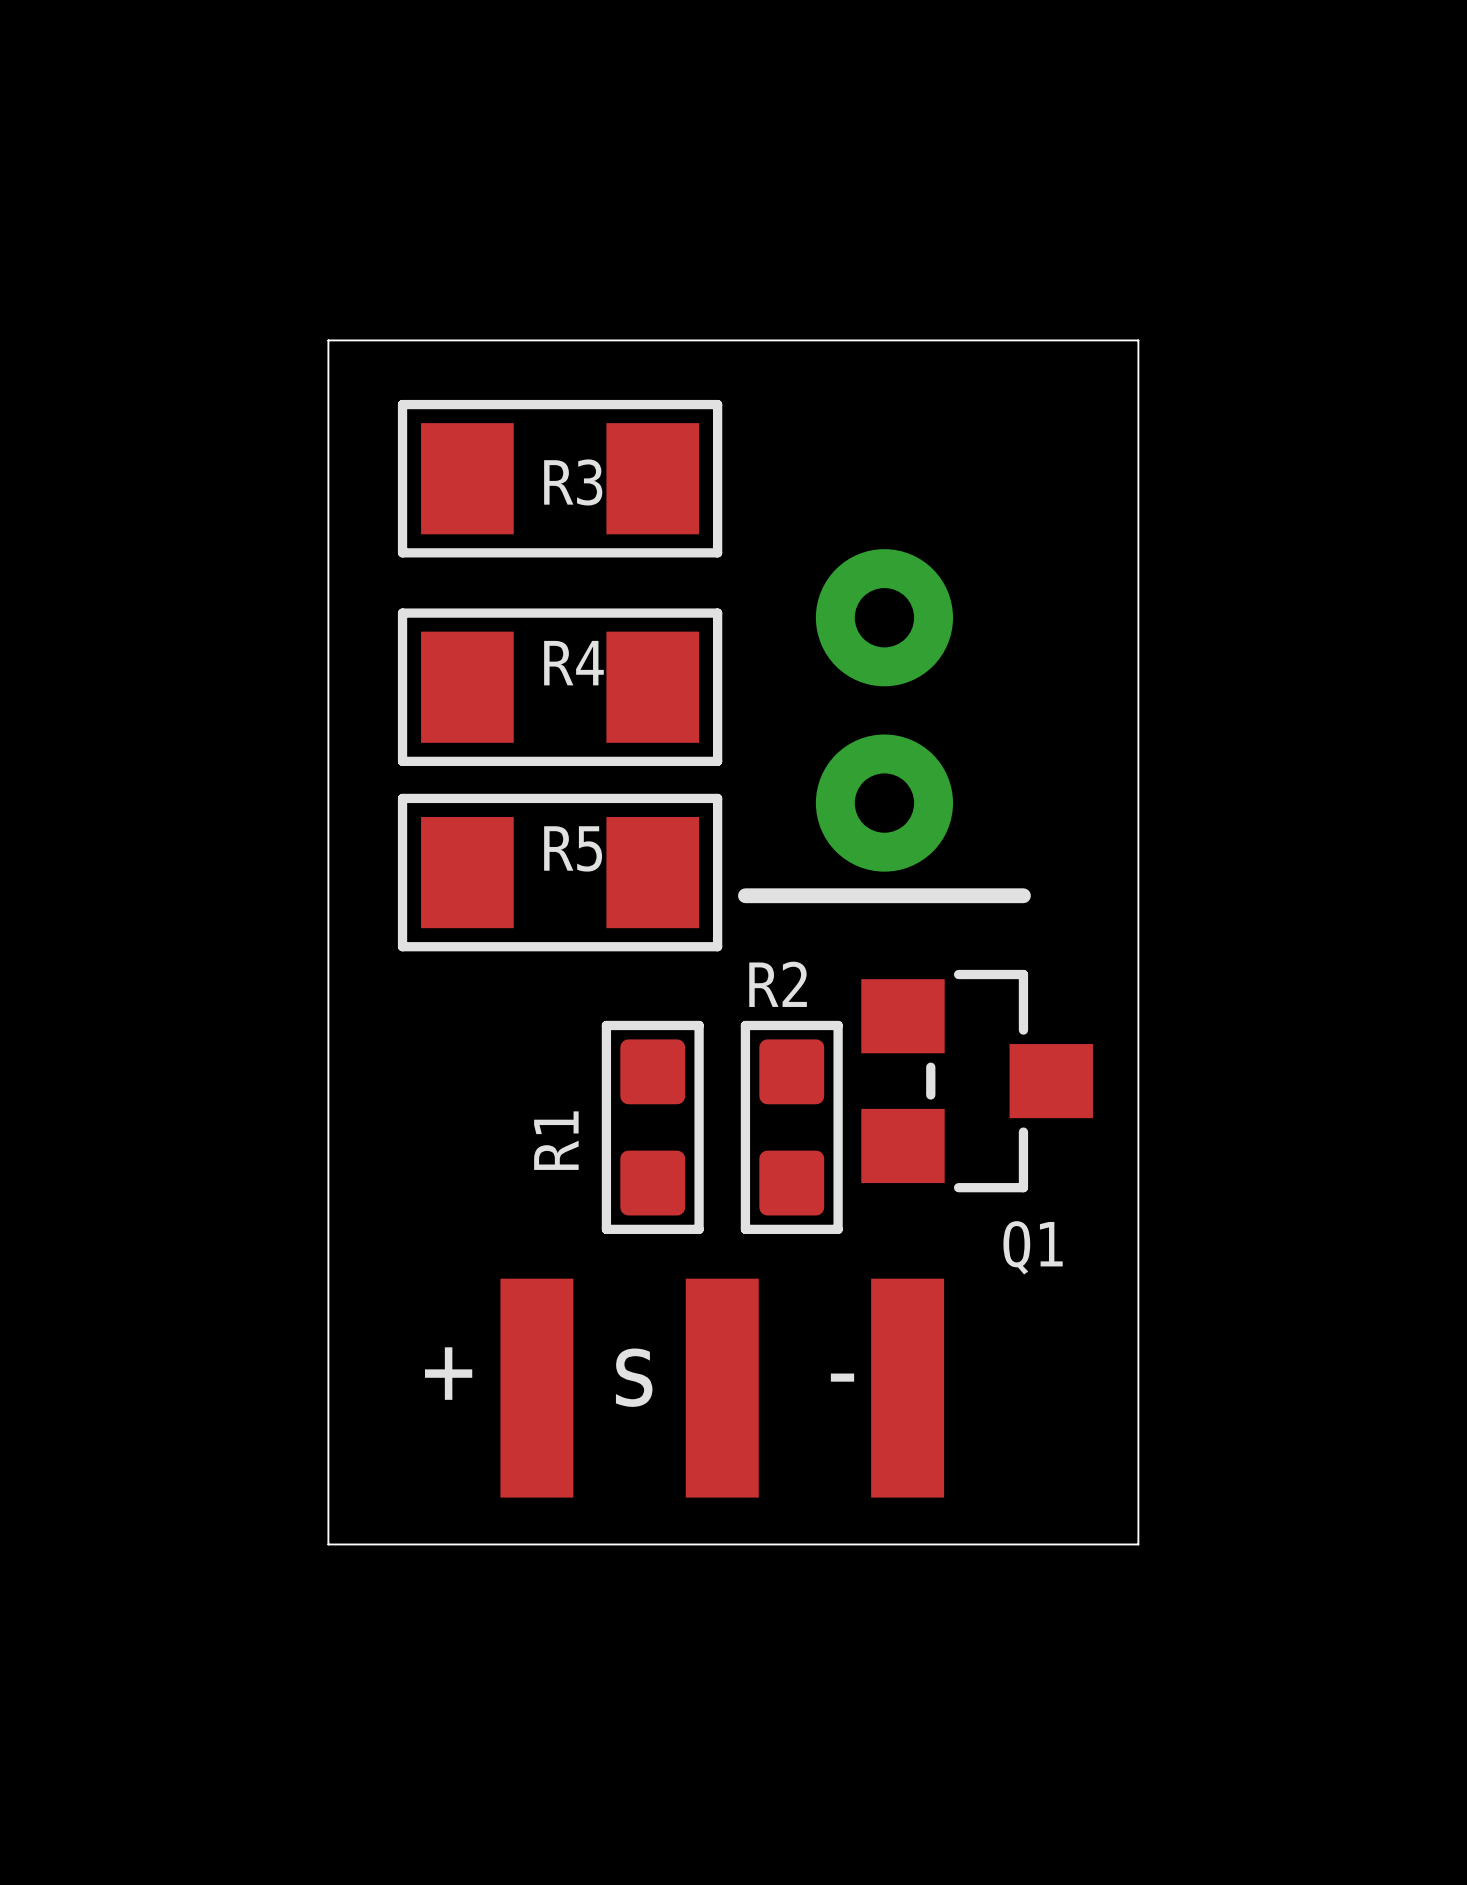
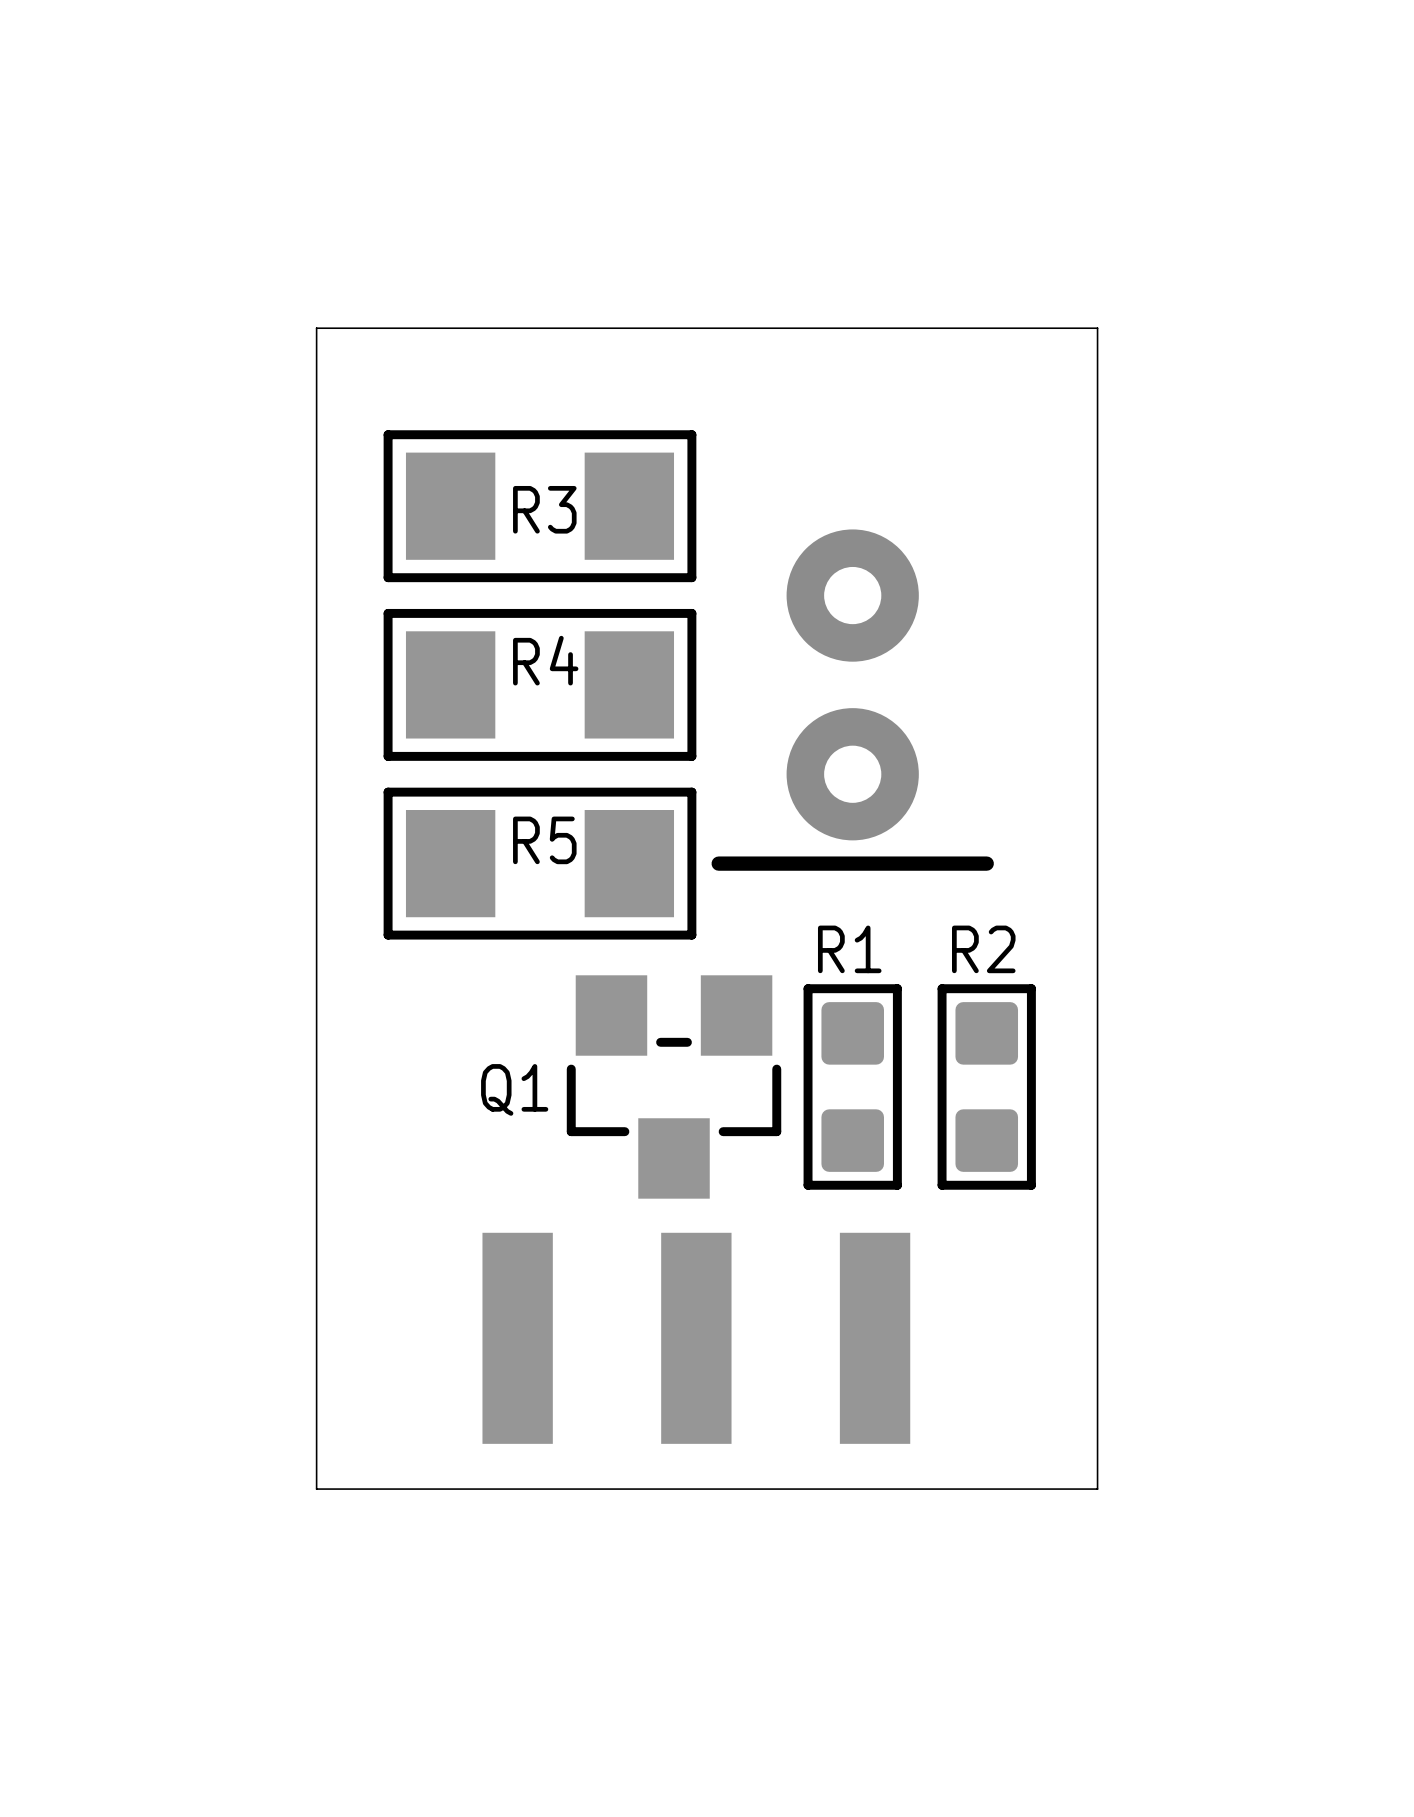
R3 position: (560, 478) -> (539, 506)
R4 position: (560, 687) -> (539, 684)
R5 position: (560, 872) -> (539, 863)
Q1 rotation: 0° (977, 1081) -> 90° clockwise (674, 1086)
Q1 position: (977, 1081) -> (674, 1086)
R1 position: (652, 1127) -> (852, 1086)
R2 position: (791, 1127) -> (986, 1086)
R1 name rotation: 0° (556, 1140) -> 90° clockwise (849, 949)
R1 name position: R1 (556, 1140) -> R1 (849, 949)
text: + (448, 1373) -> none
text: s (634, 1377) -> none
text: - (842, 1377) -> none

